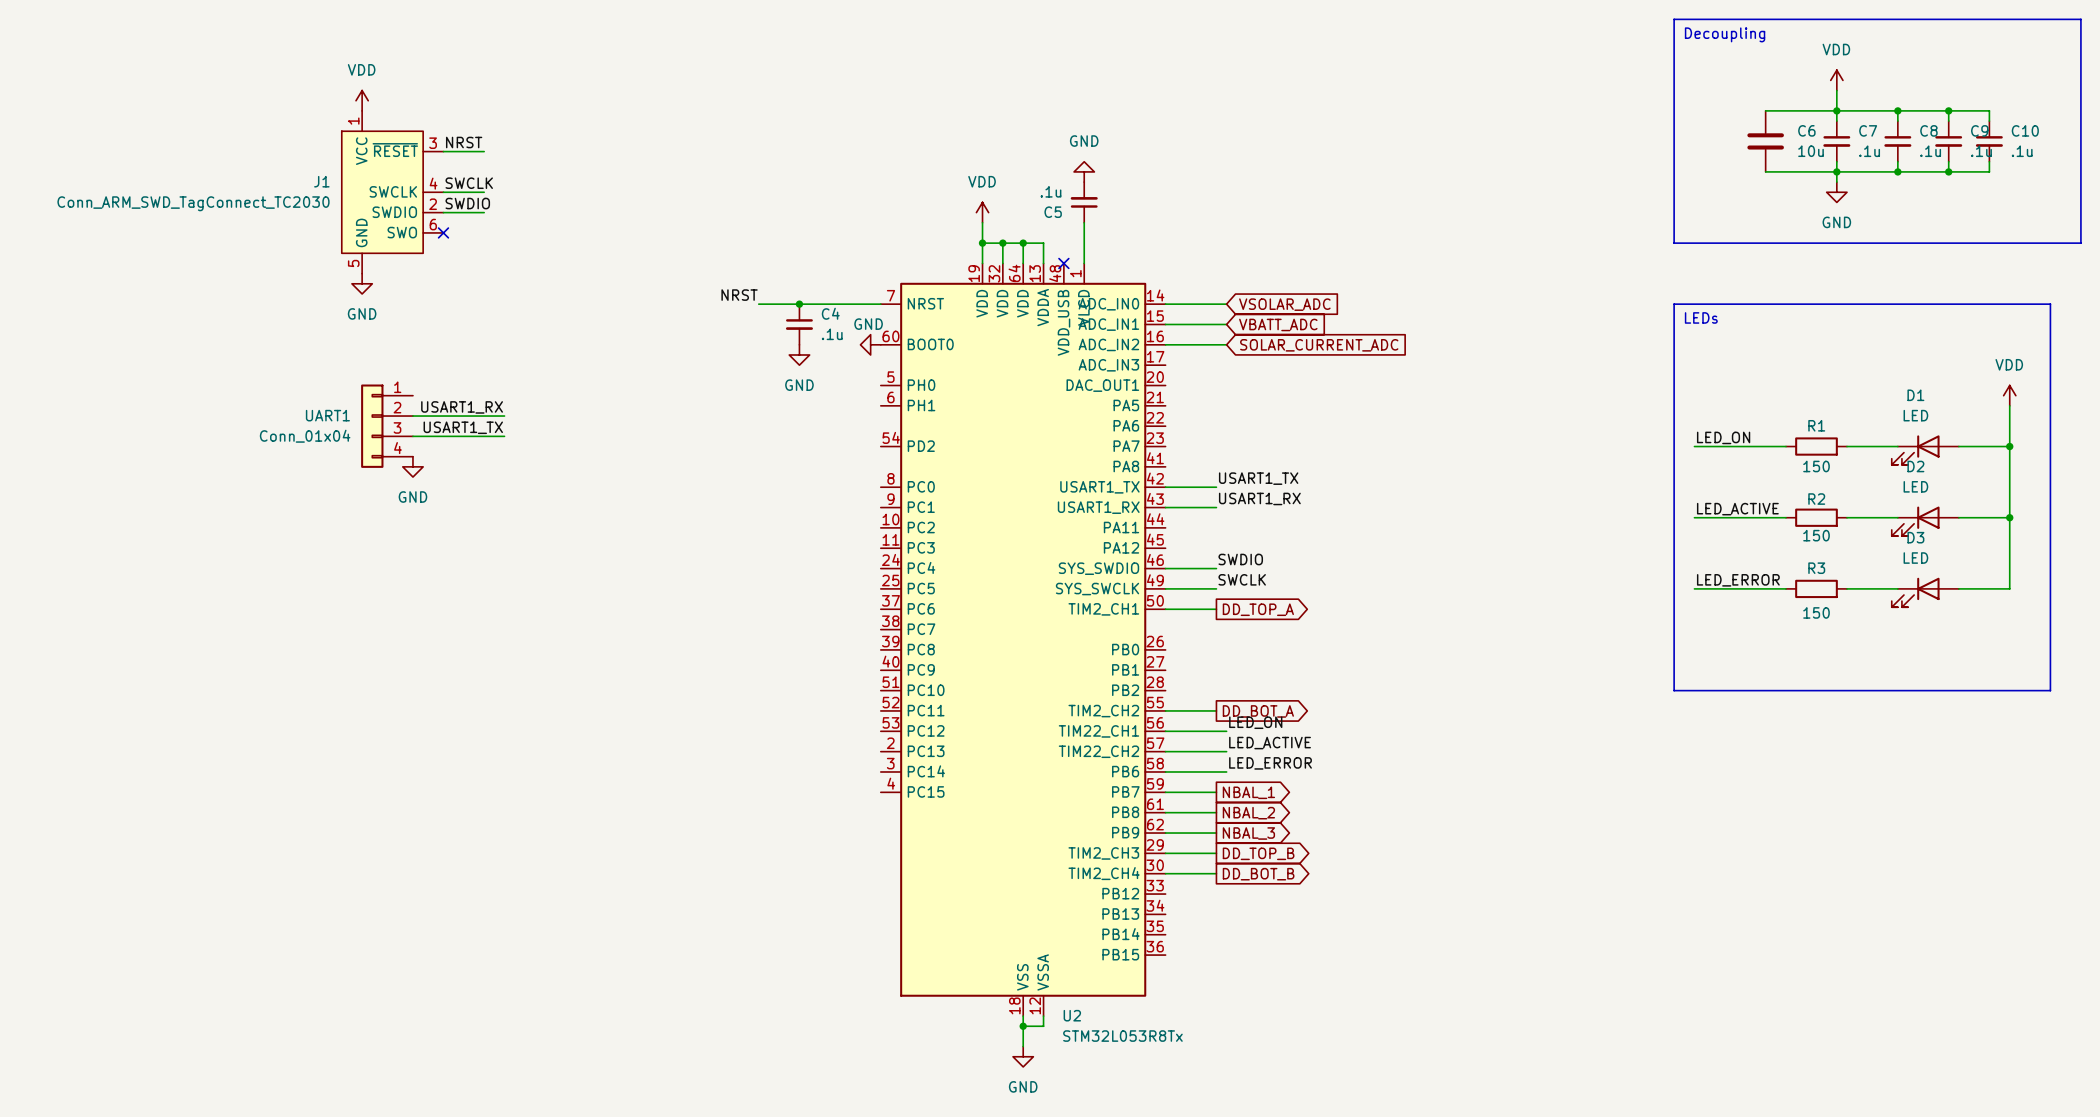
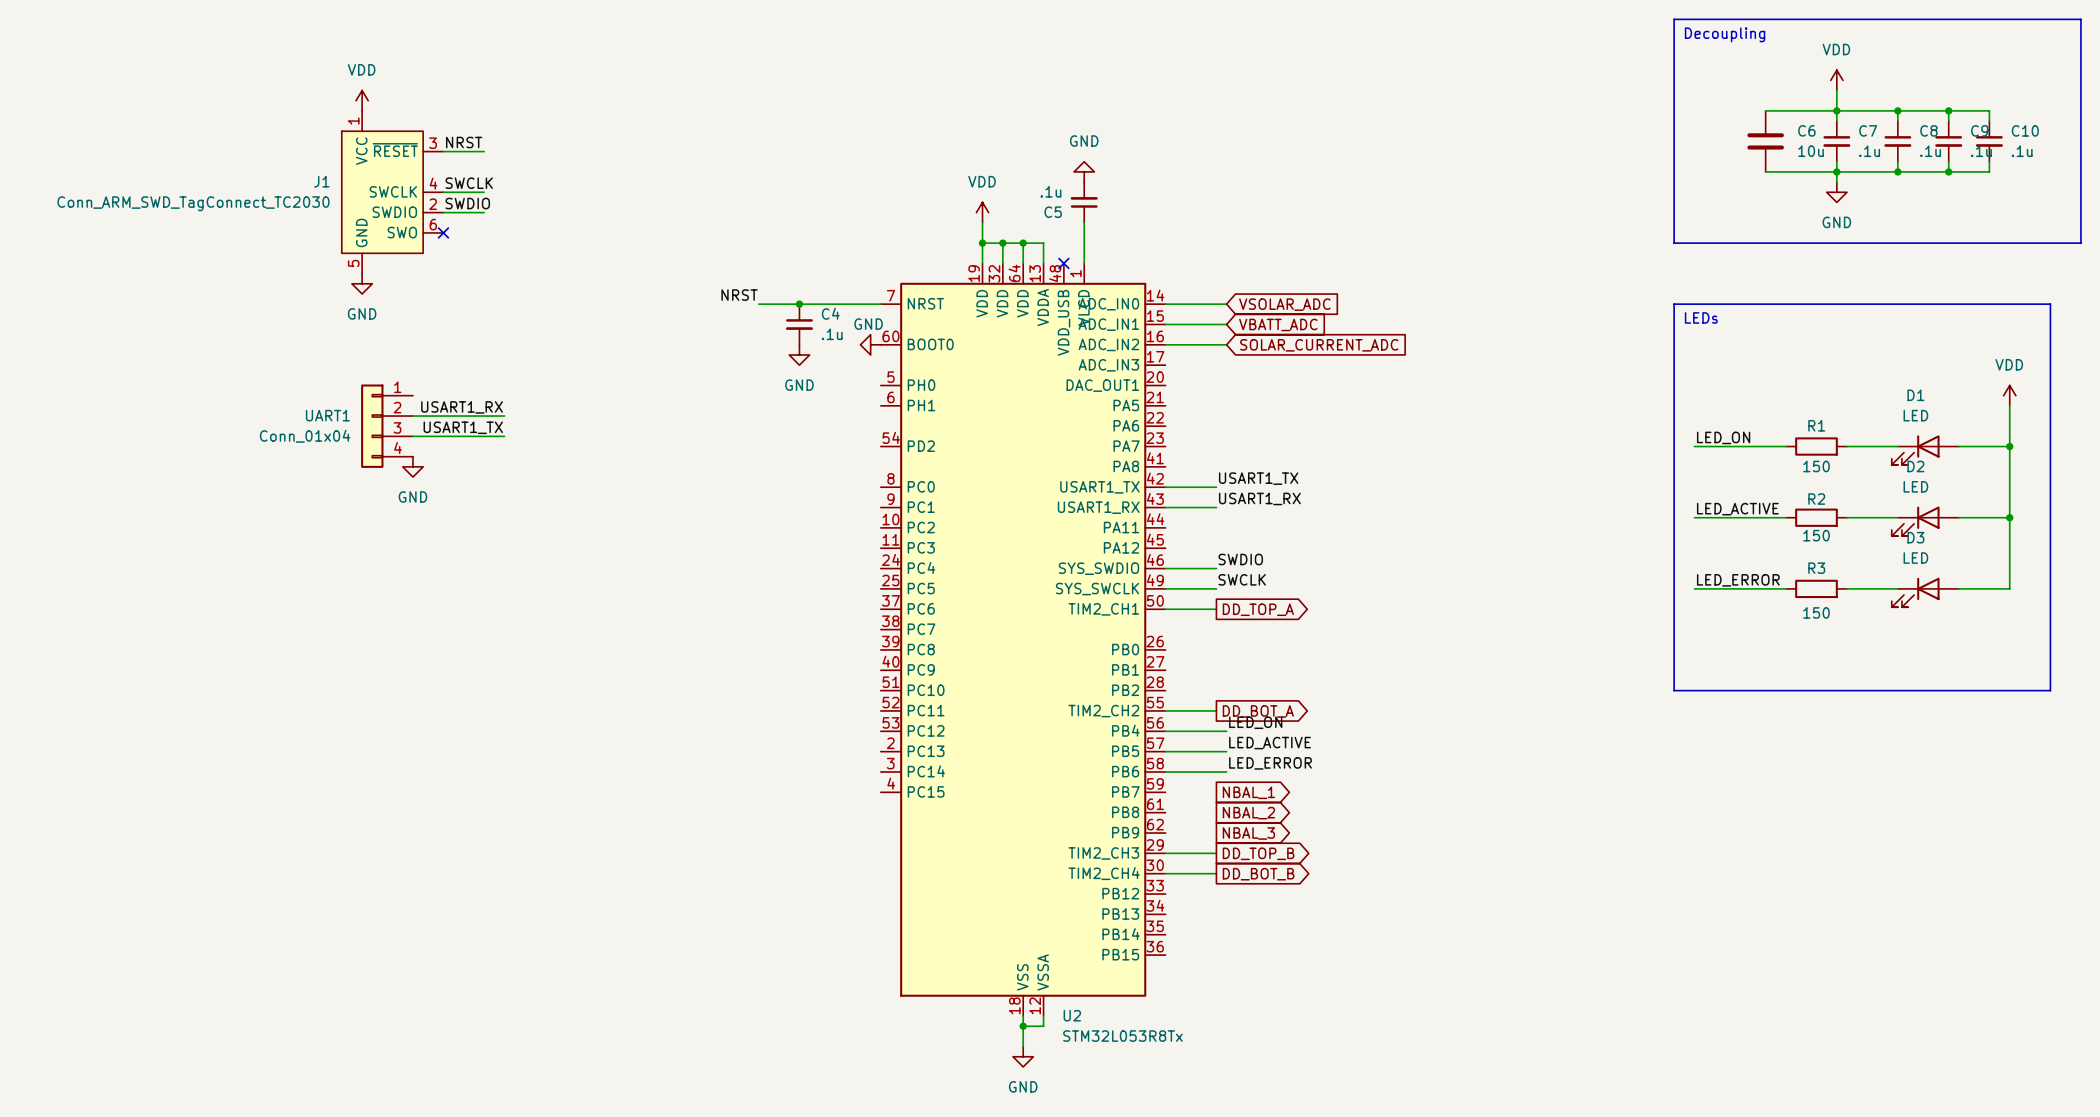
U2 pin name: TIM22_CH1 (1098, 731) -> PB4 (1125, 730)
U2 pin name: TIM22_CH2 (1098, 751) -> PB5 (1125, 751)
wire: (1165, 792) (1216, 792) -> none
wire: (1165, 812) (1216, 812) -> none
wire: (1165, 833) (1216, 833) -> none

